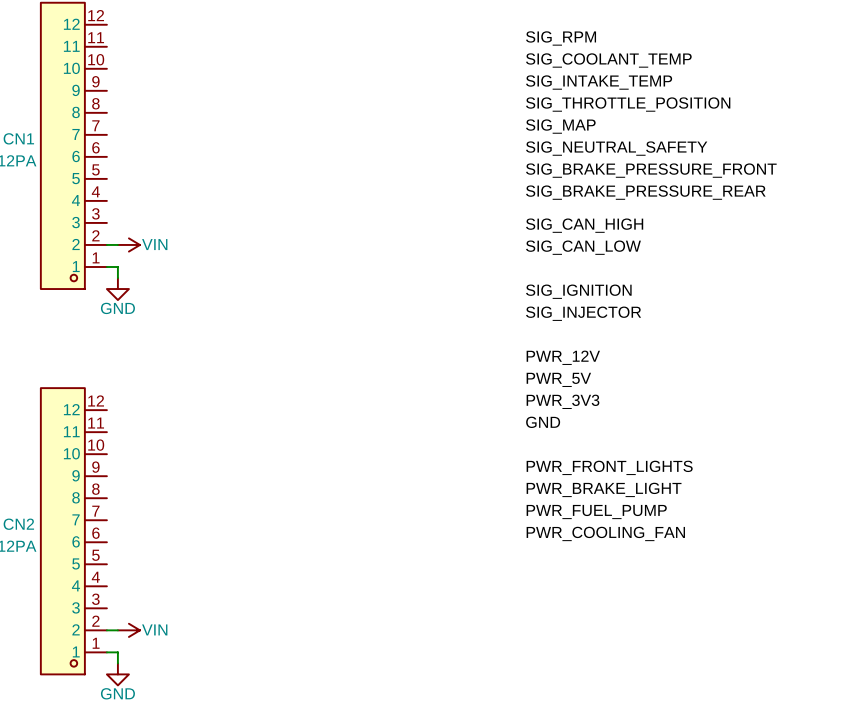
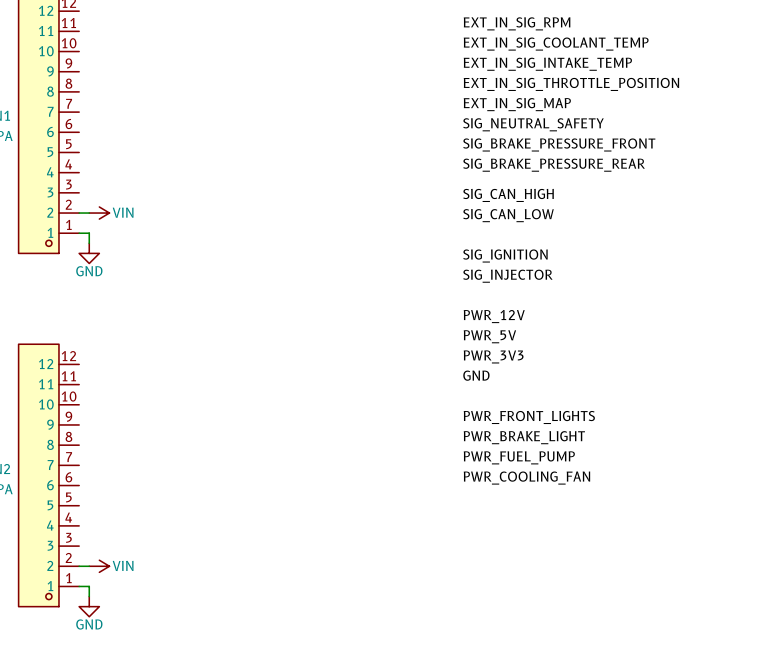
label: SIG_RPM (561, 38) -> EXT_IN_SIG_RPM (517, 23)
label: SIG_COOLANT_TEMP (608, 60) -> EXT_IN_SIG_COOLANT_TEMP (556, 44)
label: SIG_INTAKE_TEMP (599, 82) -> EXT_IN_SIG_INTAKE_TEMP (547, 64)
label: SIG_THROTTLE_POSITION (628, 104) -> EXT_IN_SIG_THROTTLE_POSITION (571, 84)
label: SIG_MAP (560, 126) -> EXT_IN_SIG_MAP (517, 104)

